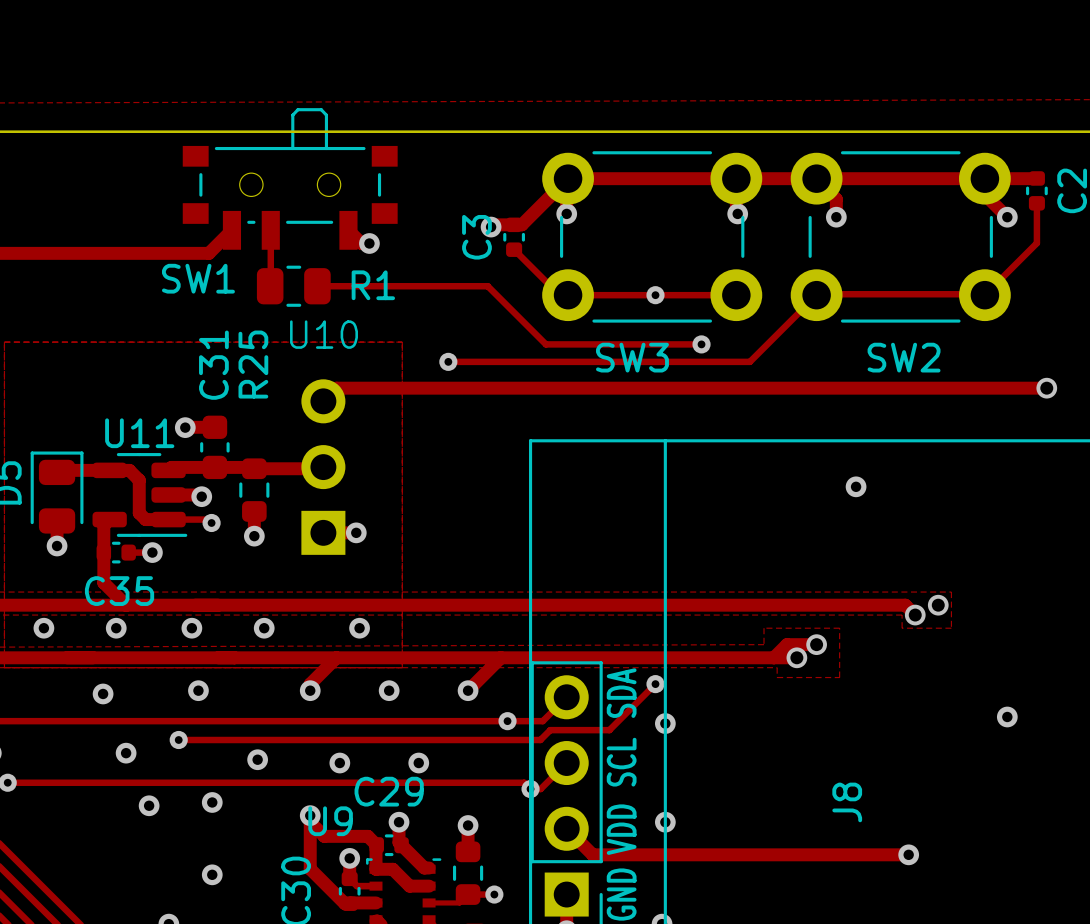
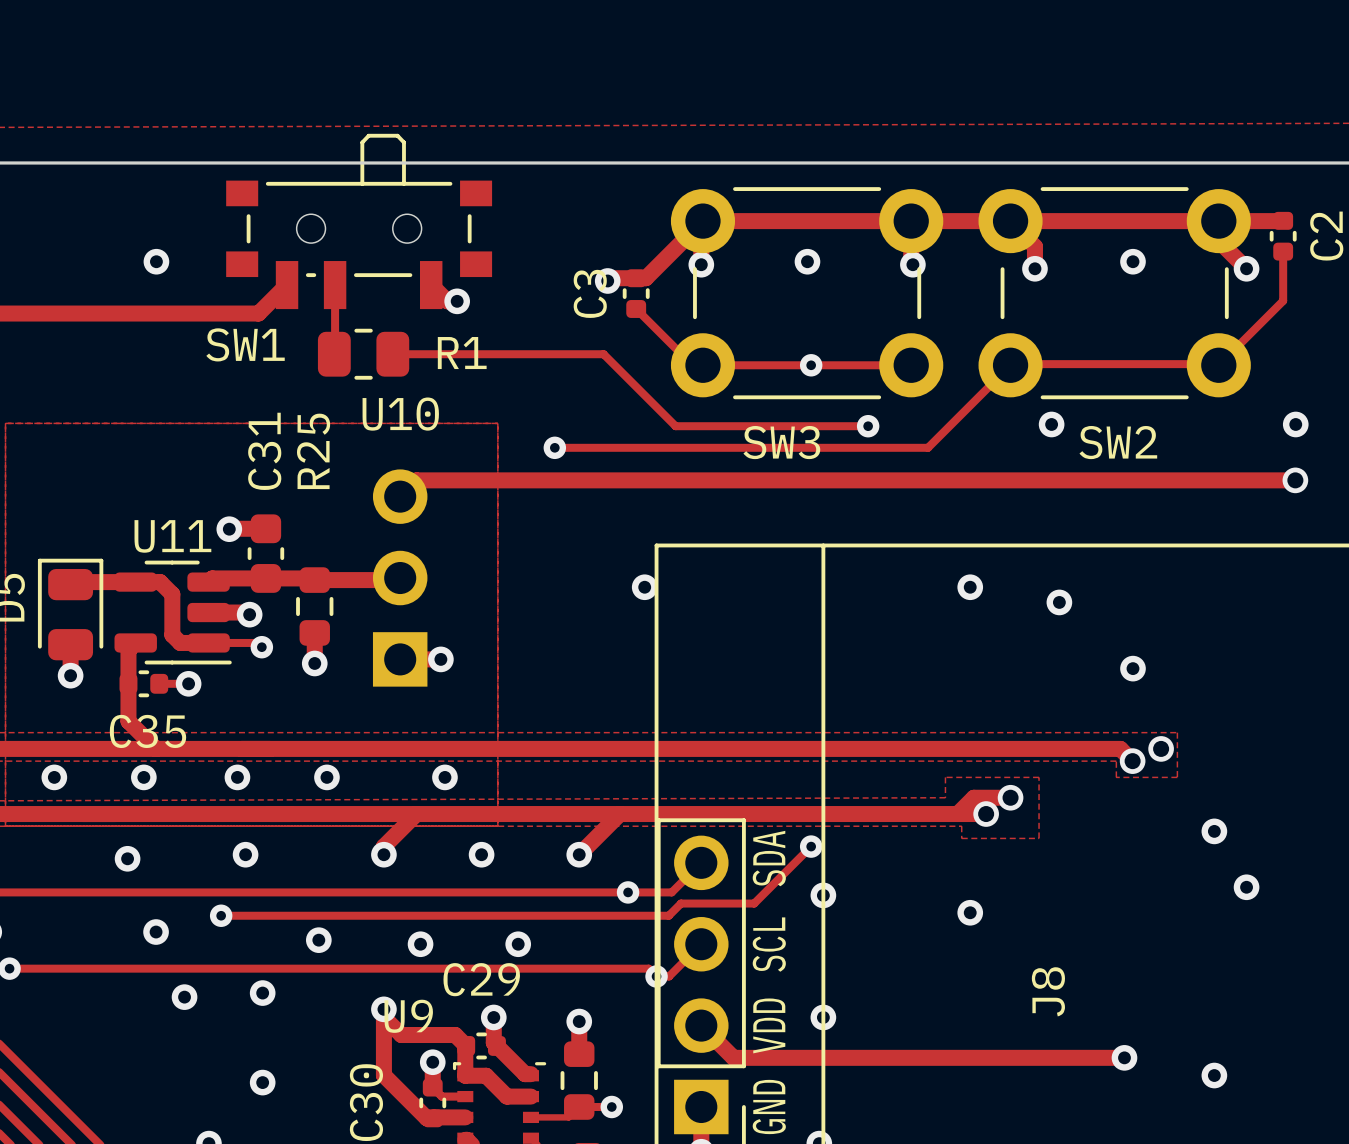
via: none -> (156, 261)
via: none -> (807, 261)
via: none -> (1132, 261)
via: none -> (1051, 424)
via: none -> (1295, 424)
via: none -> (644, 587)
via: none -> (970, 587)
via: none -> (1132, 668)
via: none -> (1214, 831)
via: none -> (970, 912)
via: none -> (1214, 1075)

